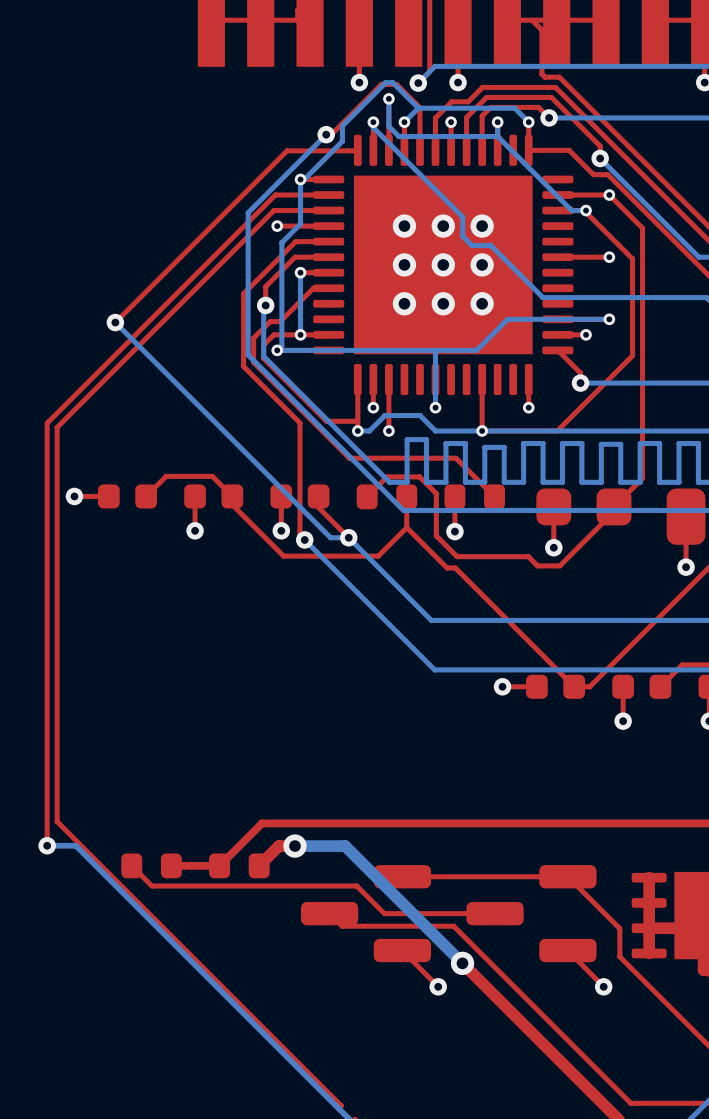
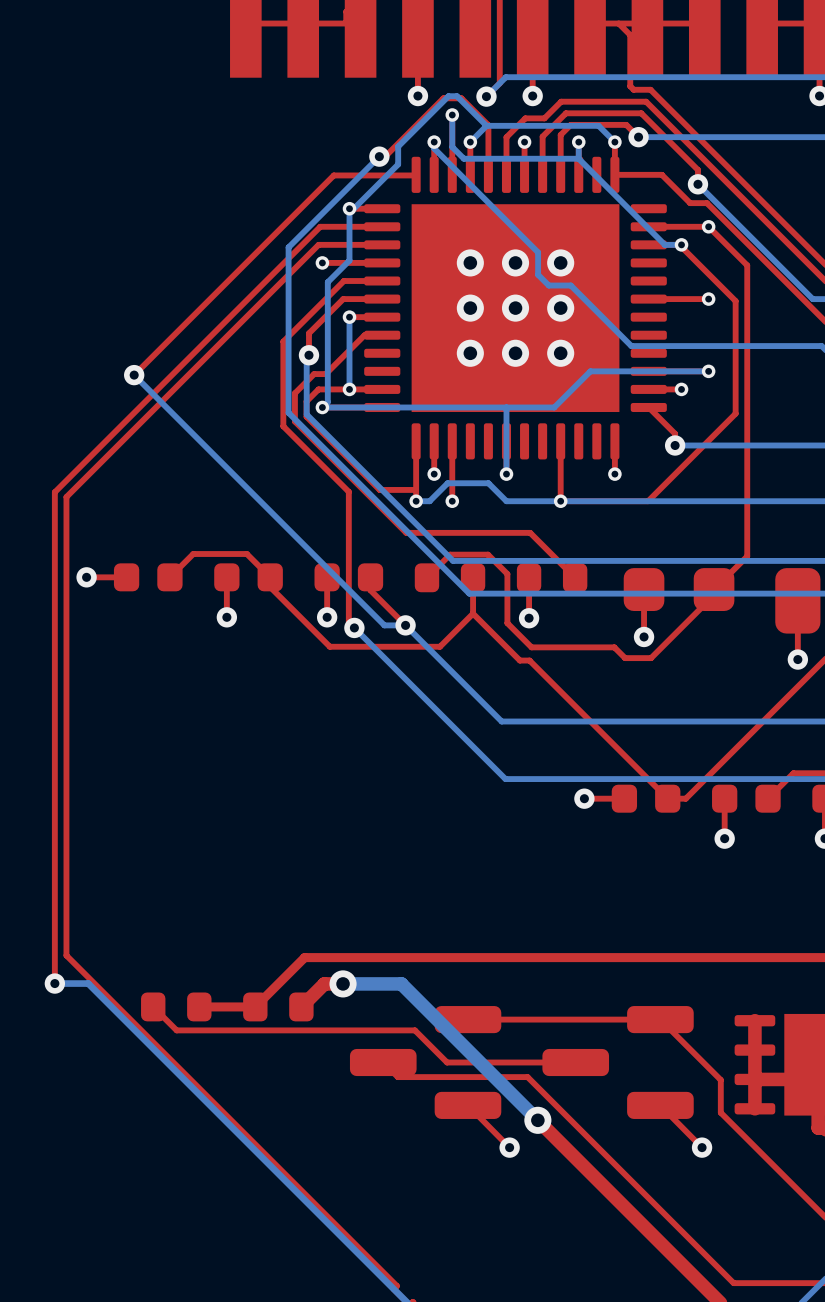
bottom track: (426, 482) (426, 439) (407, 439) (407, 482) -> (496, 560) (473, 560)
bottom track: (465, 482) (465, 443) (445, 443) (445, 482) -> (541, 560) (518, 560)
bottom track: (504, 482) (504, 447) (484, 447) (484, 482) -> (586, 560) (563, 560)
bottom track: (543, 482) (543, 443) (523, 443) (523, 482) -> (631, 560) (608, 560)
bottom track: (581, 482) (581, 443) (562, 443) (562, 482) -> (676, 560) (654, 560)
bottom track: (620, 482) (620, 444) (601, 444) (601, 482) -> (721, 560) (699, 560)
bottom track: (659, 482) (659, 443) (640, 443) (640, 482) -> (767, 560) (744, 560)
bottom track: (698, 482) (698, 443) (679, 443) (679, 482) -> (812, 560) (789, 560)

